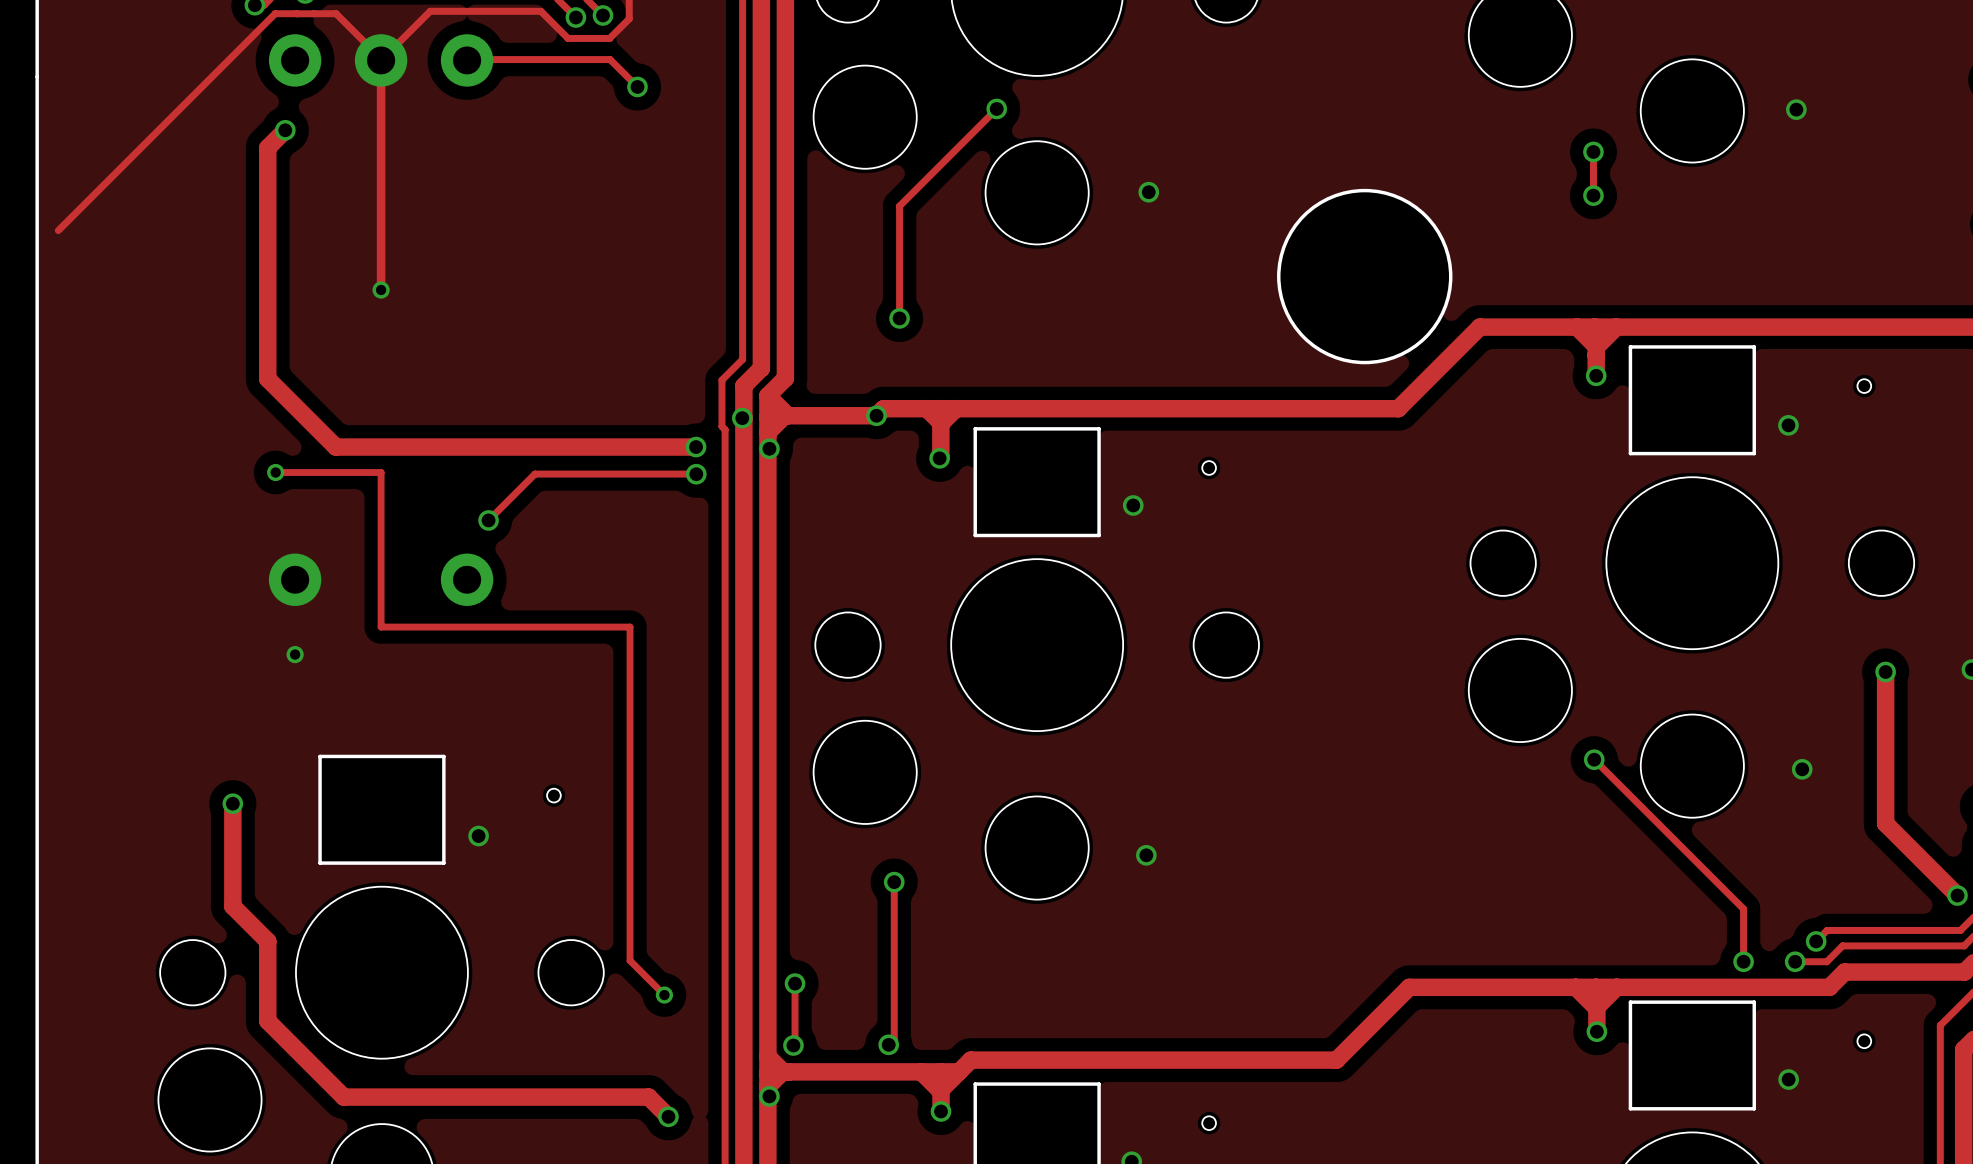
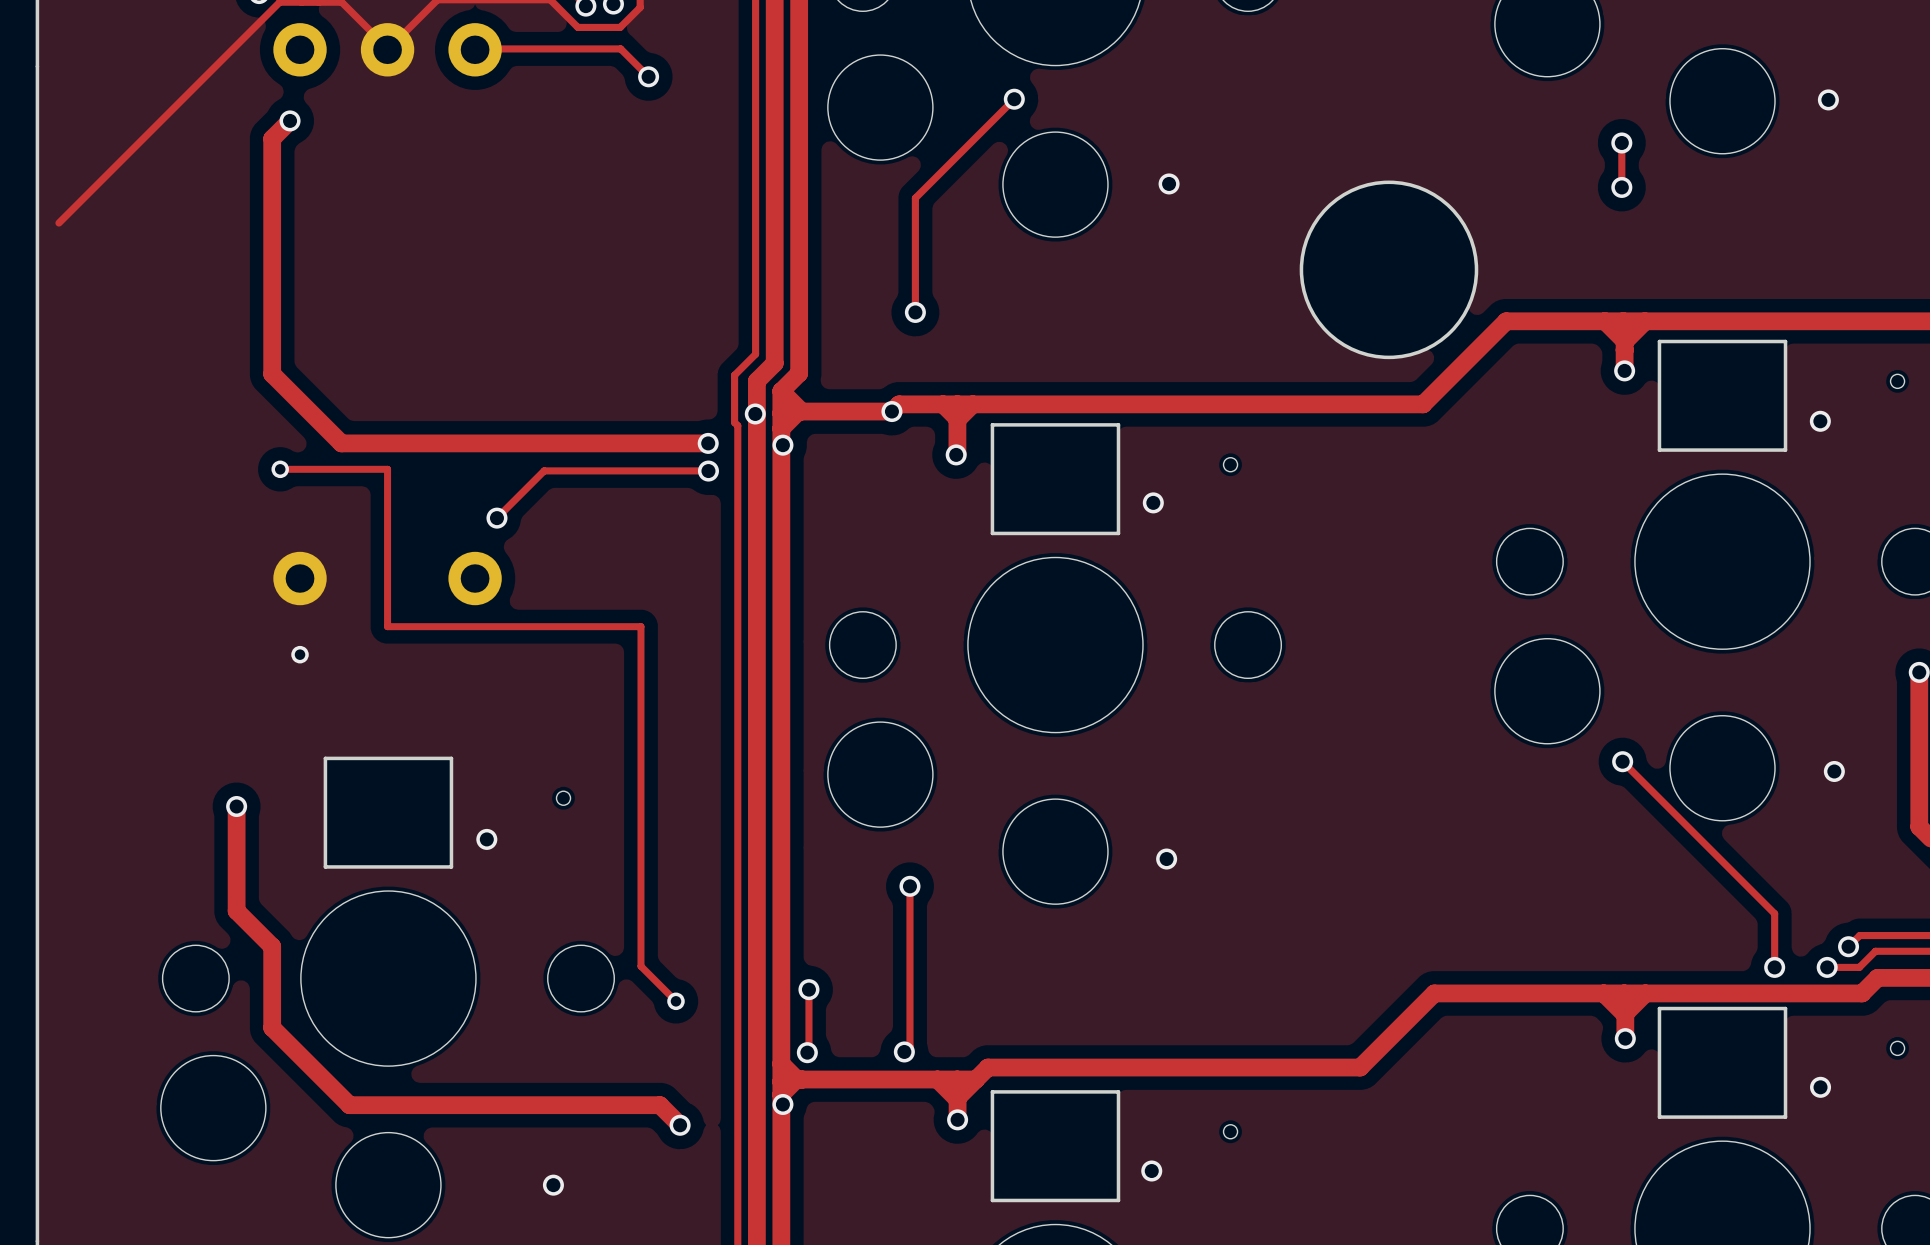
track: (381, 59) (381, 290) -> none
via: (381, 290) -> none

